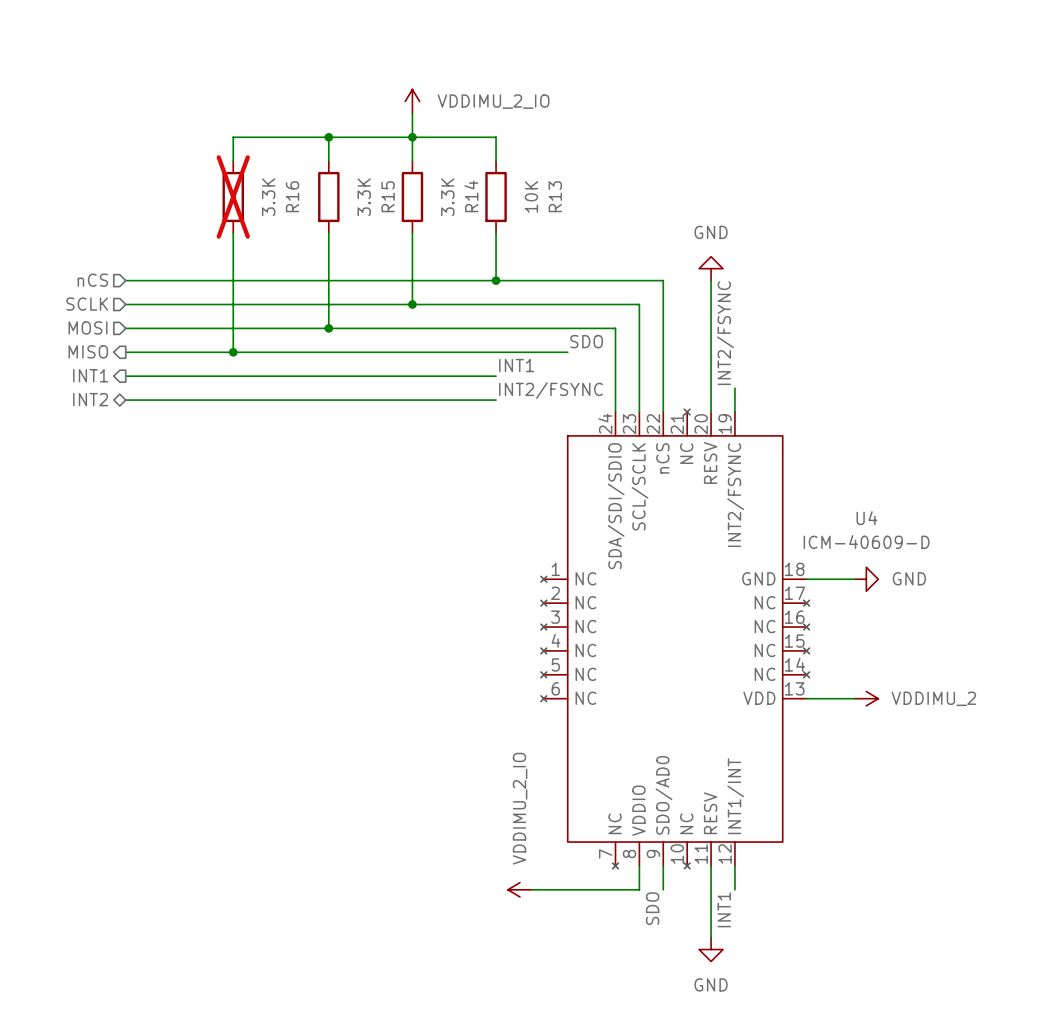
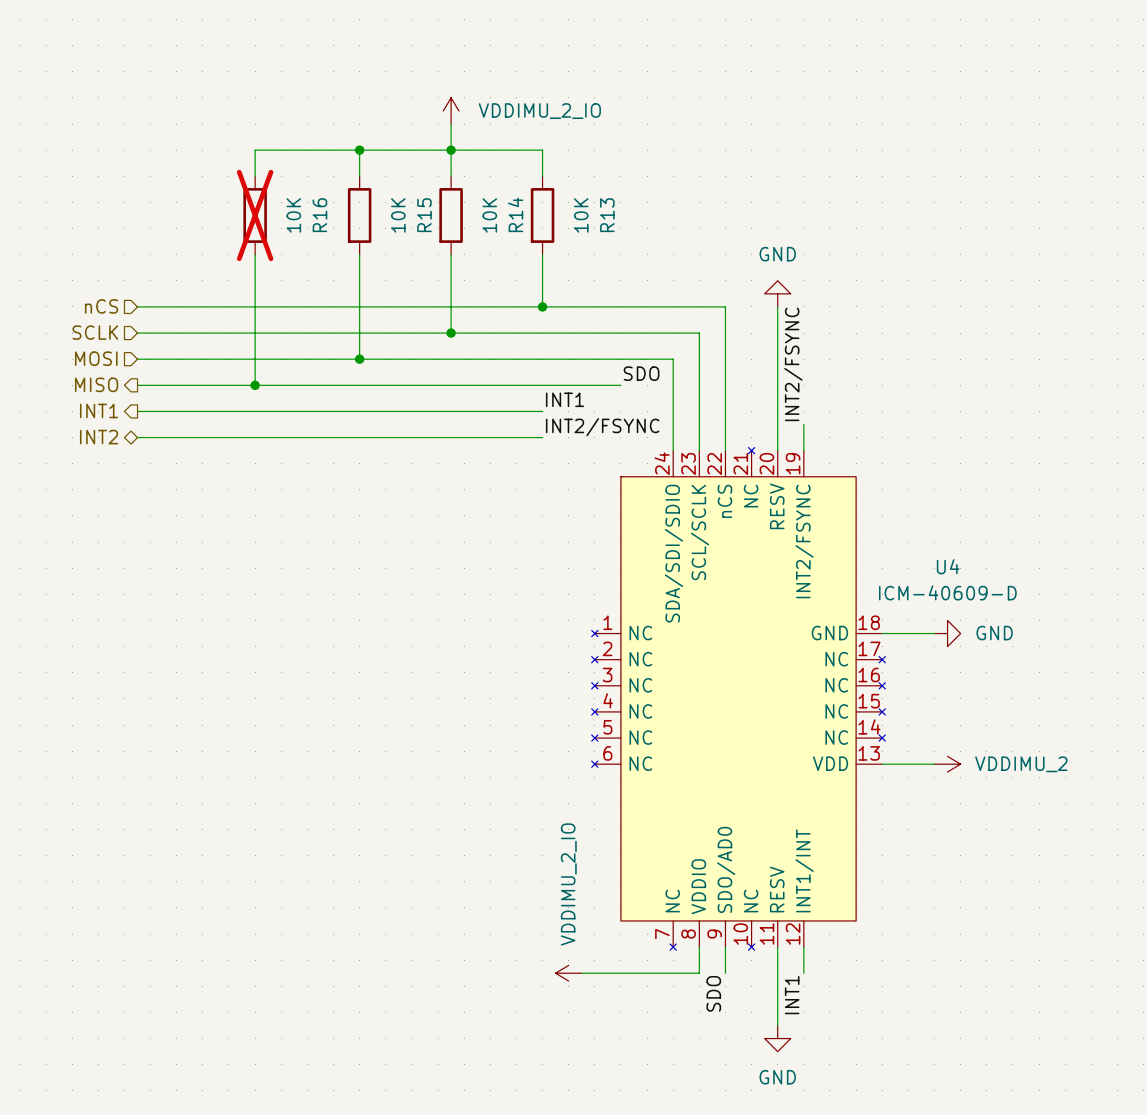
R16 value: 3.3K (268, 197) -> 10K (293, 215)
R15 value: 3.3K (364, 197) -> 10K (398, 215)
R14 value: 3.3K (447, 197) -> 10K (489, 215)

